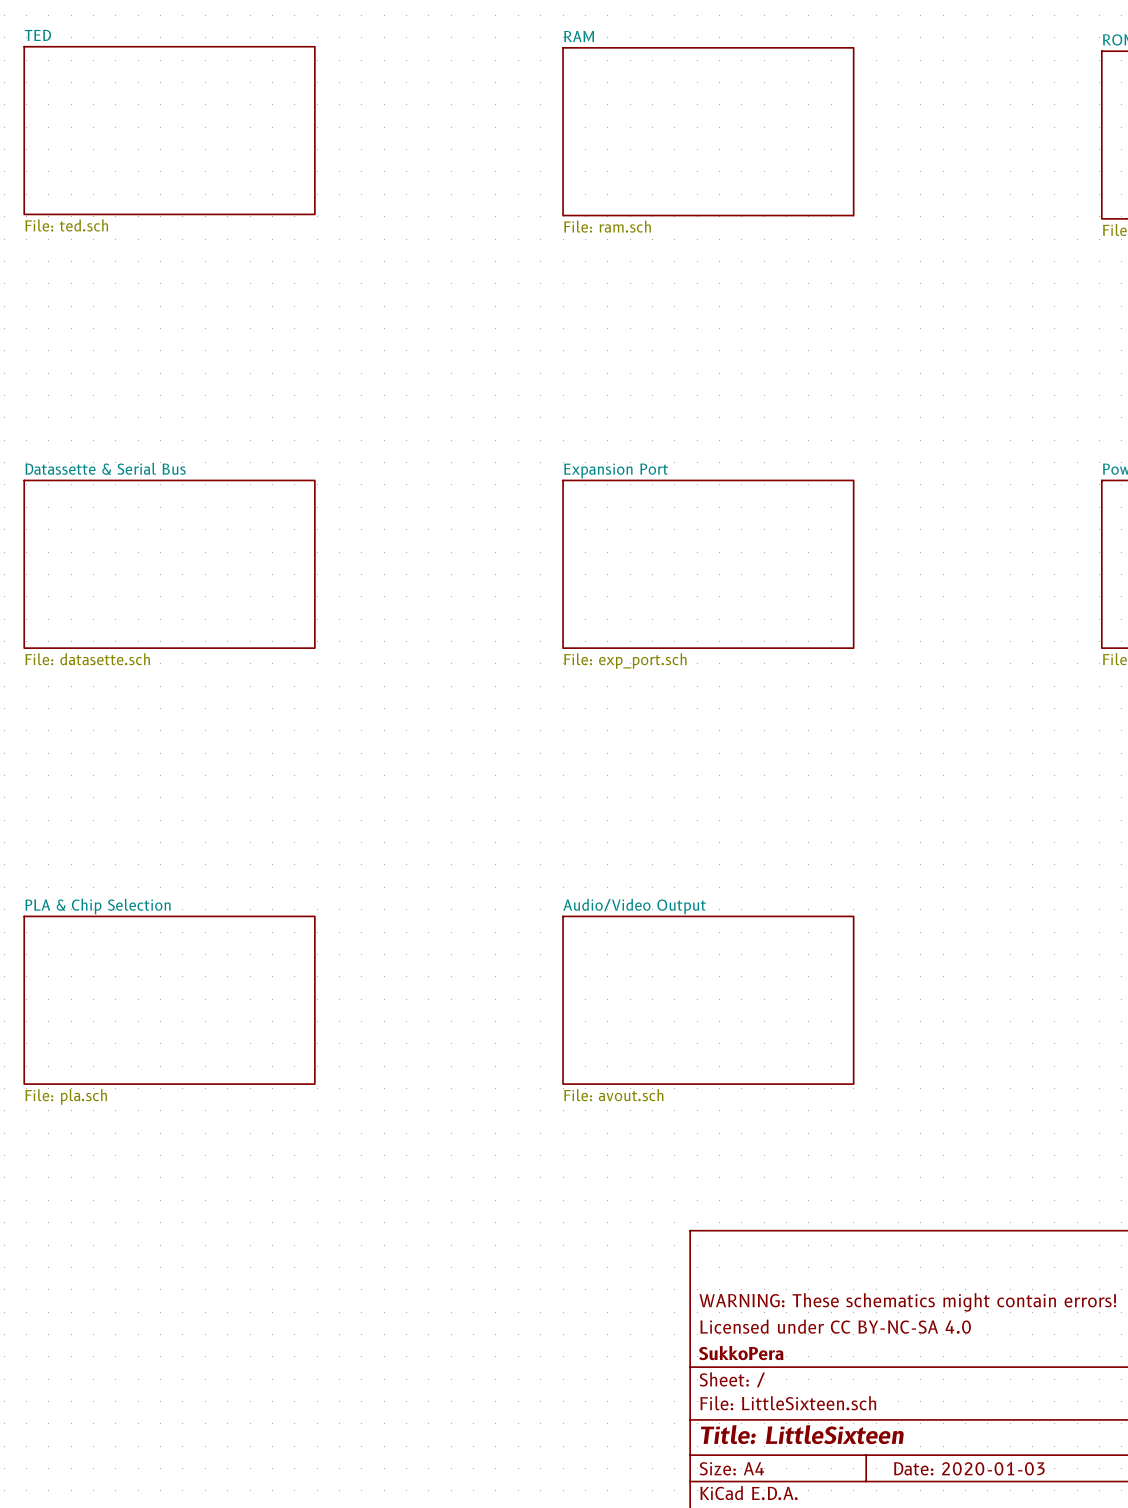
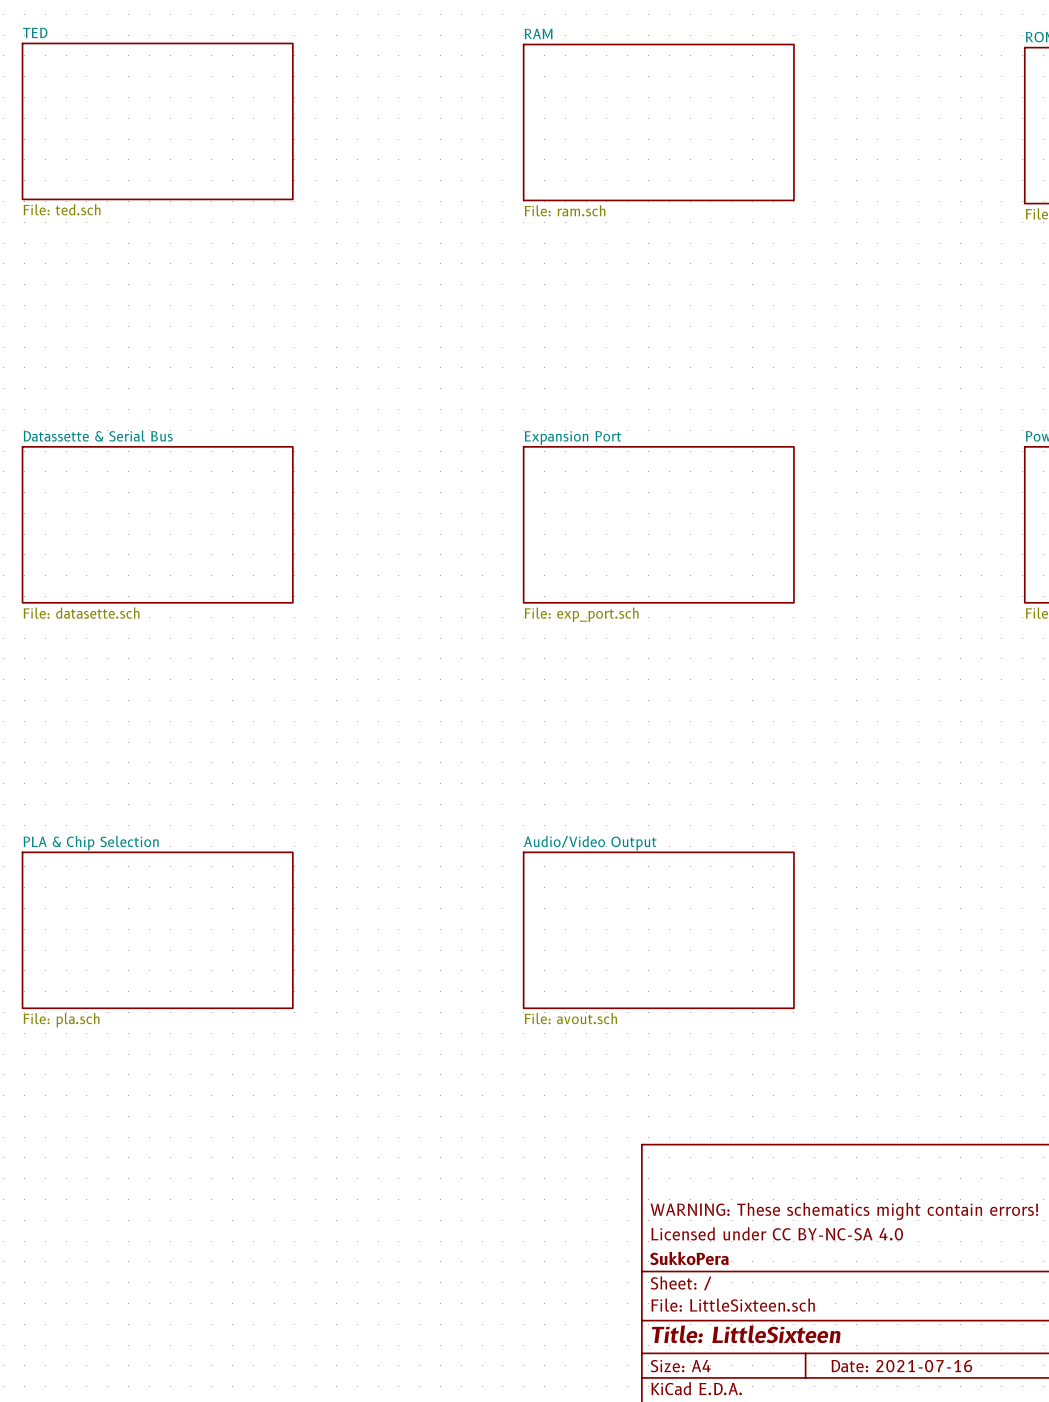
title block: Date: 2020-01-03 (969, 1468) -> Date: 2021-07-16 (901, 1366)

